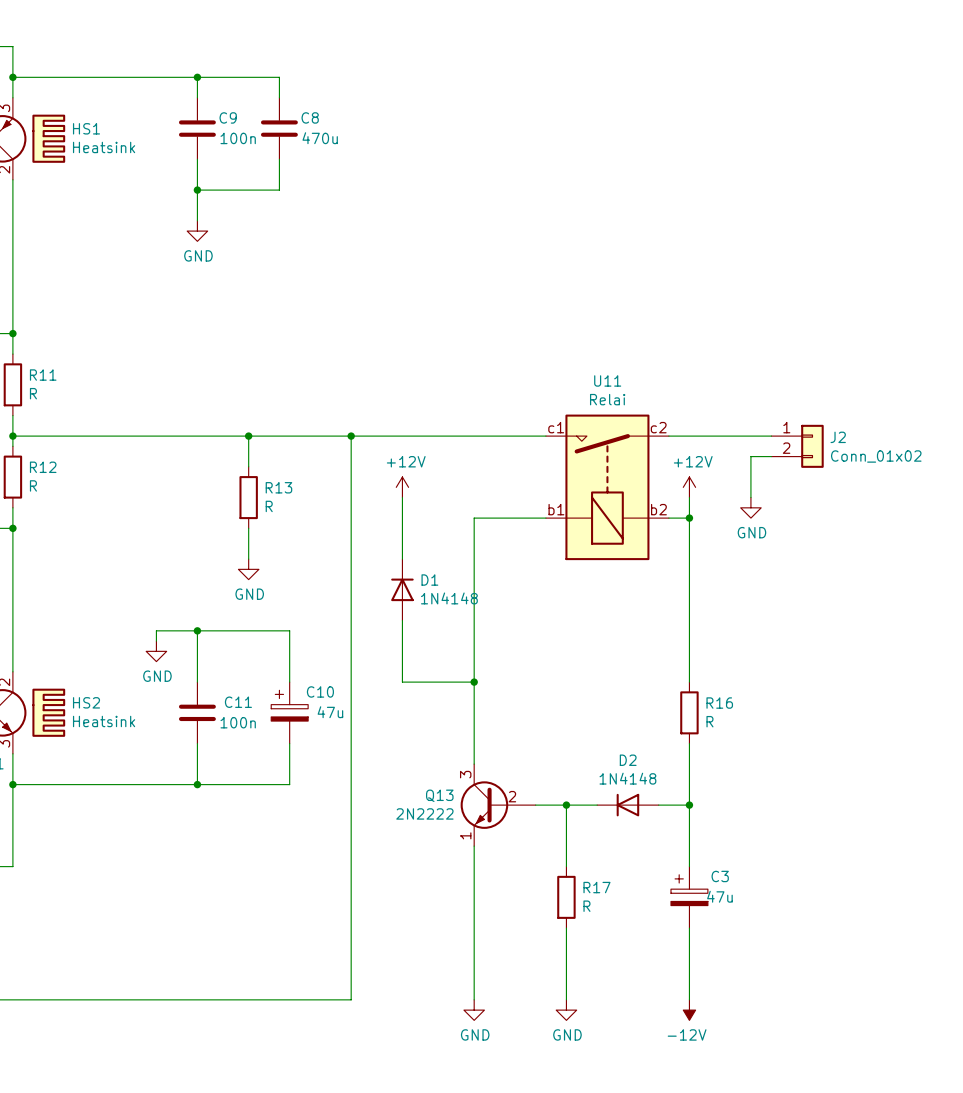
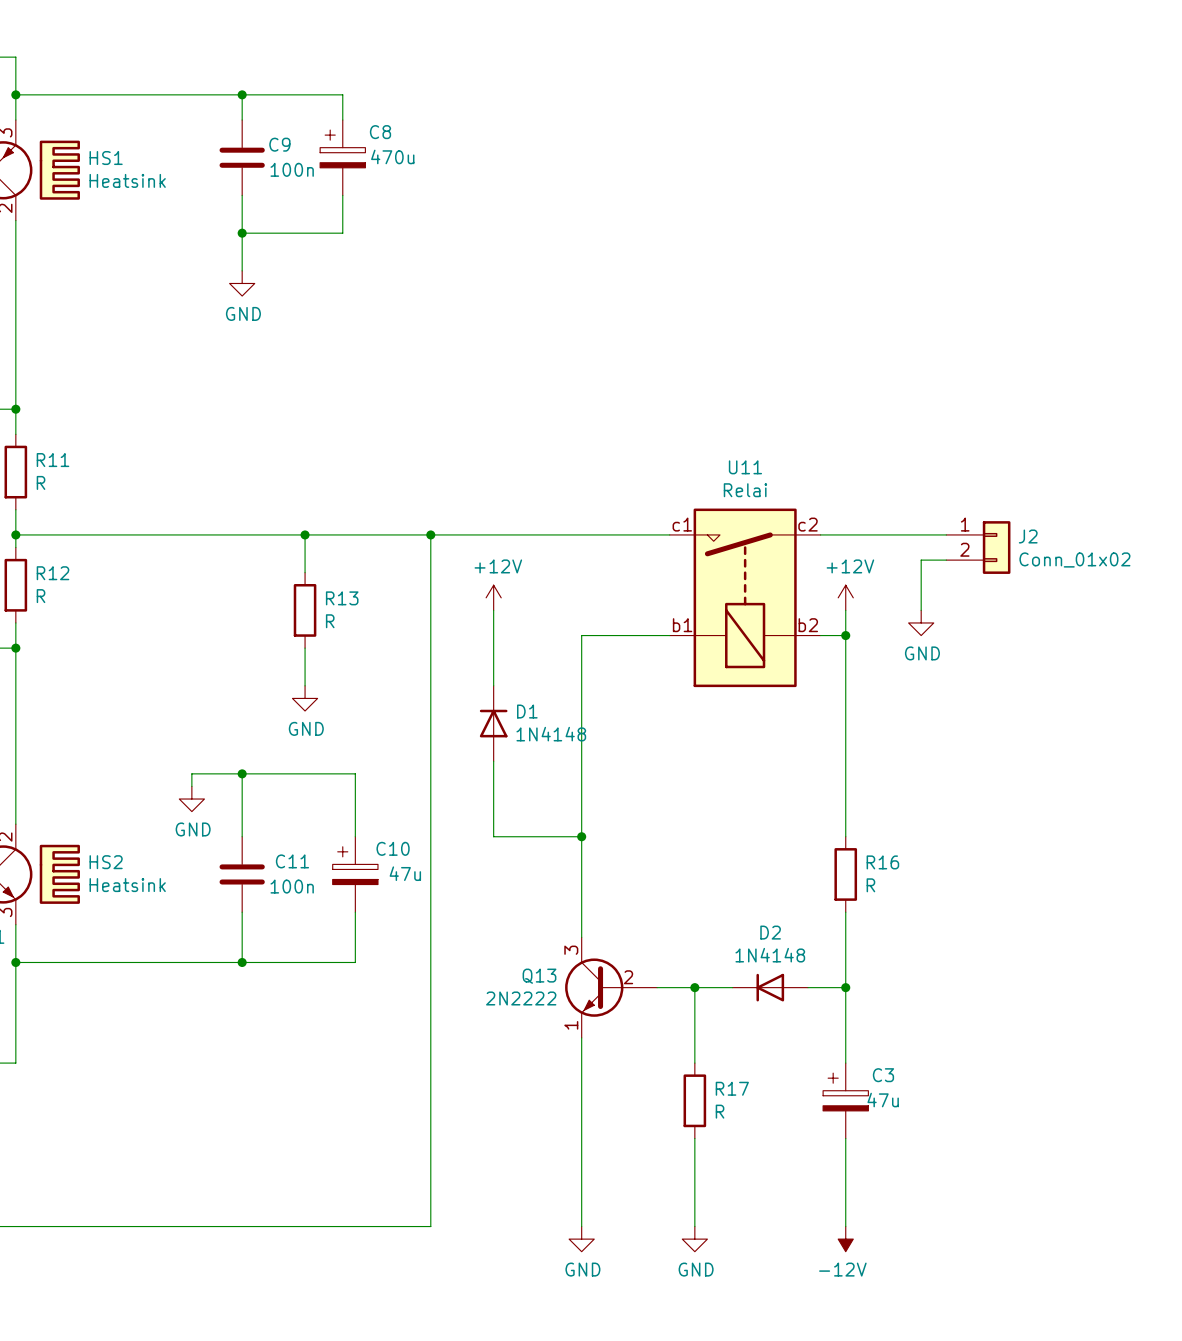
C8 symbol: [260, 97, 298, 160] -> [320, 120, 366, 196]

